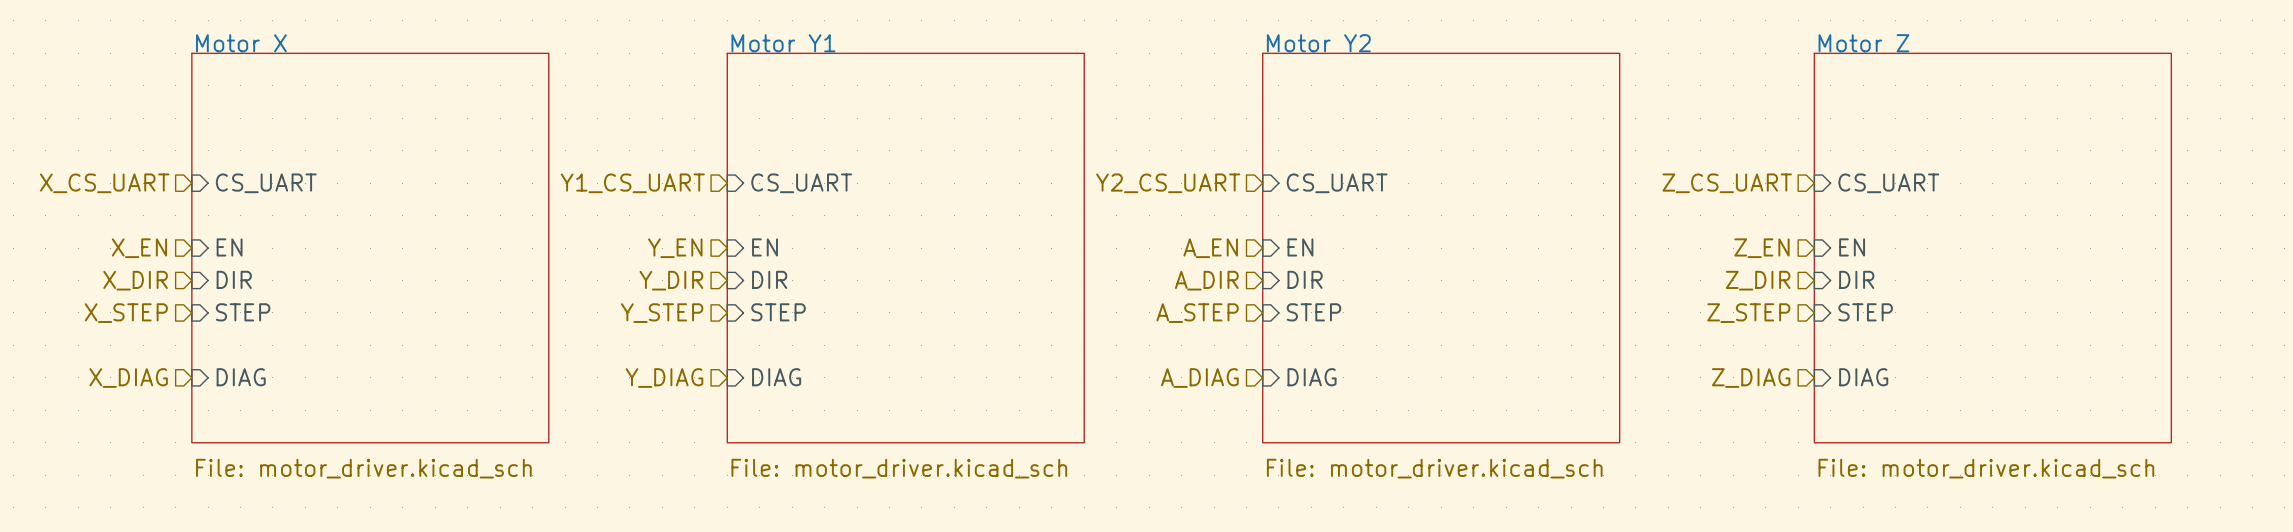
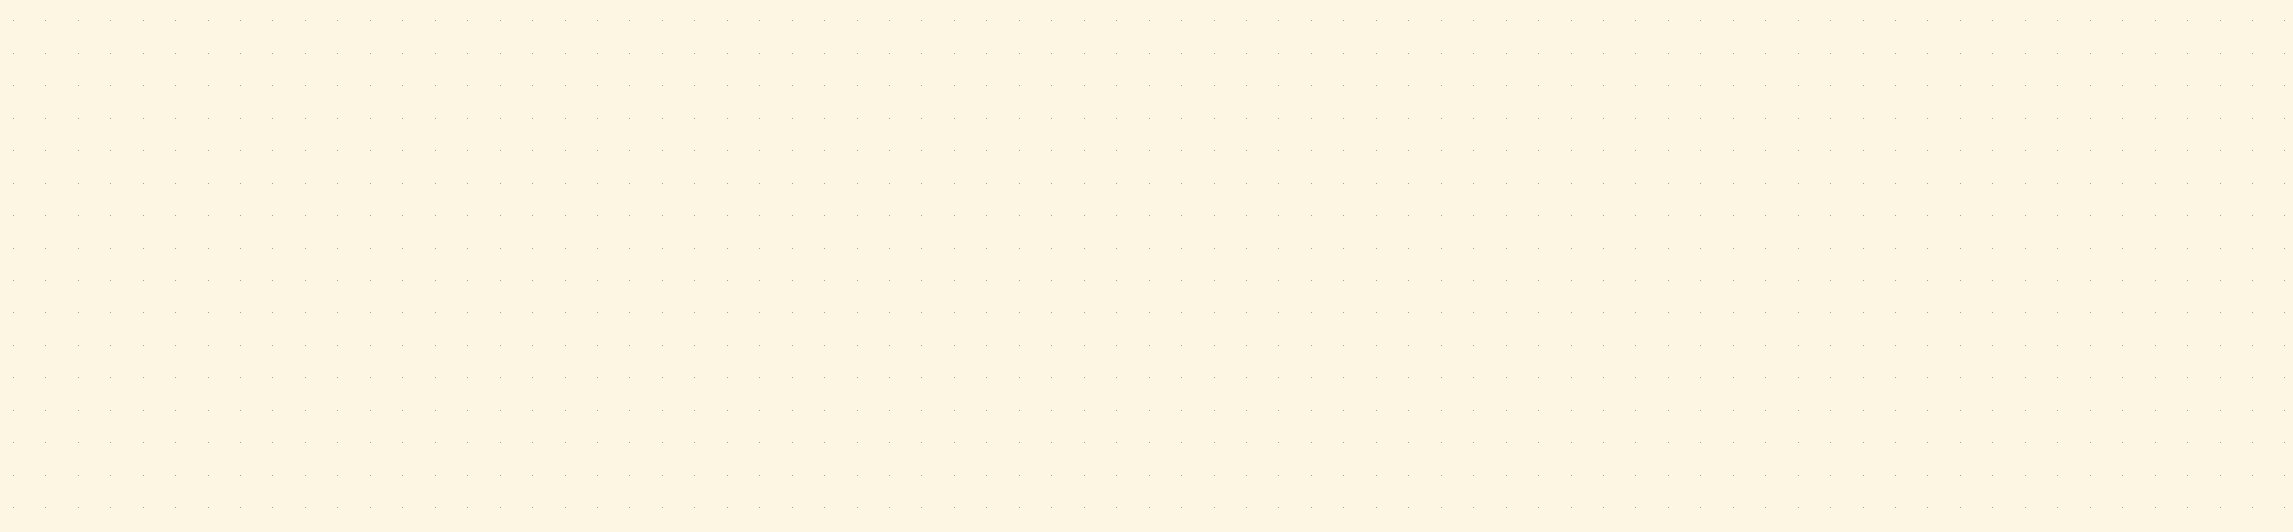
hierarchical label: X_CS_UART (104, 183) -> none
sheet pin: CS_UART (266, 183) -> none
hierarchical label: Y1_CS_UART (632, 183) -> none
sheet pin: CS_UART (801, 183) -> none
hierarchical label: Y2_CS_UART (1168, 183) -> none
sheet pin: CS_UART (1337, 183) -> none
hierarchical label: Z_CS_UART (1727, 183) -> none
sheet pin: CS_UART (1888, 183) -> none
sheet pin: EN (229, 247) -> none
sheet pin: EN (765, 247) -> none
sheet pin: EN (1300, 247) -> none
sheet pin: EN (1852, 247) -> none
hierarchical label: X_EN (139, 248) -> none
sheet Motor X: File: motor_driver.kicad_sch (370, 248) -> none
hierarchical label: Y_EN (675, 248) -> none
sheet Motor Y1: File: motor_driver.kicad_sch (905, 248) -> none
hierarchical label: A_EN (1210, 248) -> none
sheet Motor Y2: File: motor_driver.kicad_sch (1441, 248) -> none
hierarchical label: Z_EN (1761, 248) -> none
sheet Motor Z: File: motor_driver.kicad_sch (1992, 248) -> none
sheet pin: DIR (234, 279) -> none
sheet pin: DIR (769, 279) -> none
sheet pin: DIR (1305, 279) -> none
sheet pin: DIR (1856, 279) -> none
hierarchical label: X_DIR (135, 280) -> none
hierarchical label: Y_DIR (671, 280) -> none
hierarchical label: A_DIR (1206, 280) -> none
hierarchical label: Z_DIR (1758, 280) -> none
sheet pin: STEP (243, 312) -> none
sheet pin: STEP (778, 312) -> none
sheet pin: STEP (1313, 312) -> none
sheet pin: STEP (1865, 312) -> none
hierarchical label: X_STEP (126, 313) -> none
hierarchical label: Y_STEP (662, 313) -> none
hierarchical label: A_STEP (1197, 313) -> none
hierarchical label: Z_STEP (1748, 313) -> none
sheet pin: DIAG (241, 377) -> none
sheet pin: DIAG (776, 377) -> none
sheet pin: DIAG (1312, 377) -> none
sheet pin: DIAG (1863, 377) -> none
hierarchical label: X_DIAG (128, 378) -> none
hierarchical label: Y_DIAG (664, 378) -> none
hierarchical label: A_DIAG (1199, 378) -> none
hierarchical label: Z_DIAG (1751, 378) -> none

